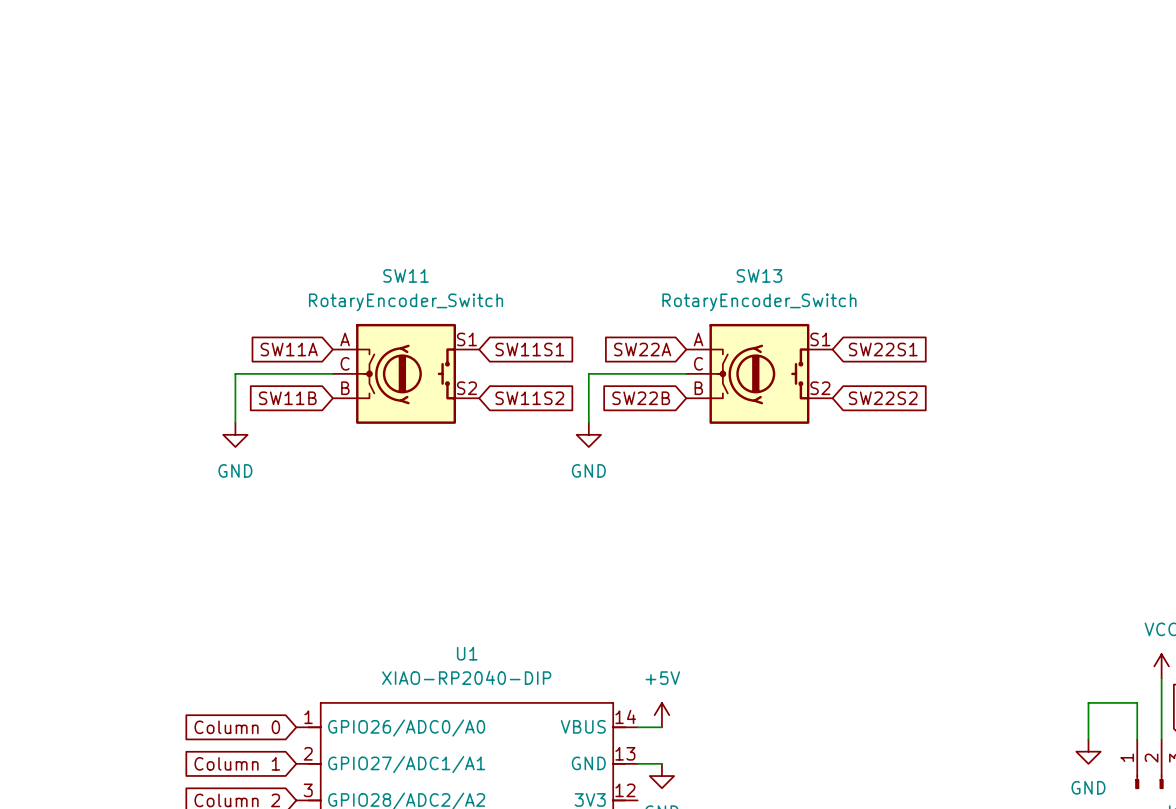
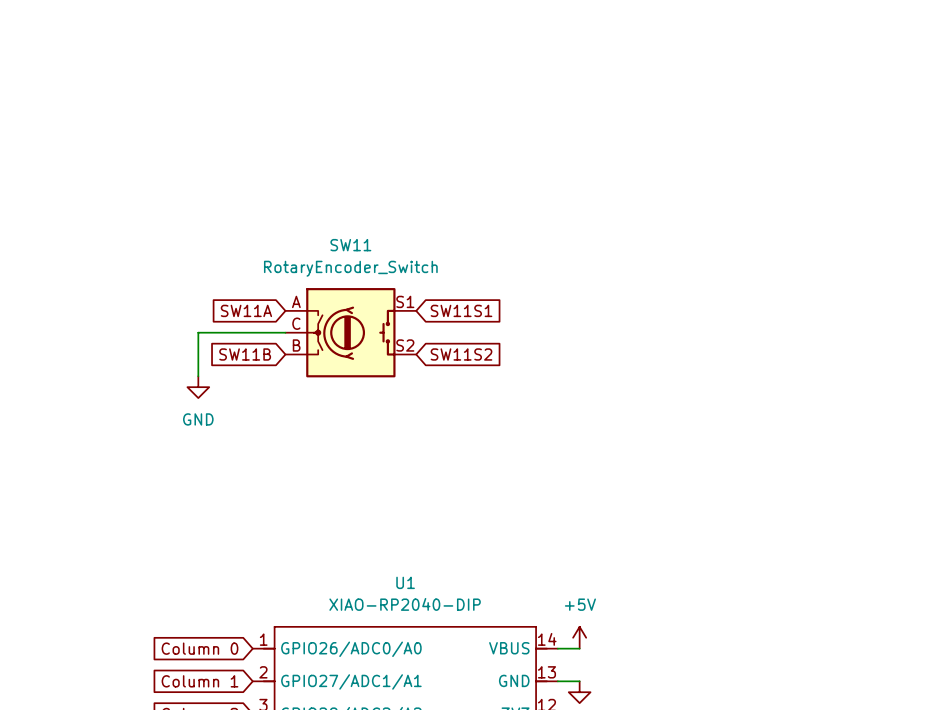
global label: SW22A (642, 349) -> none
global label: SW22S1 (883, 349) -> none
wire: (686, 373) (588, 373) (588, 422) -> none
SW13: RotaryEncoder_Switch (759, 373) -> none
global label: SW22B (641, 398) -> none
global label: SW22S2 (883, 398) -> none
power symbol: GND (588, 434) -> none

